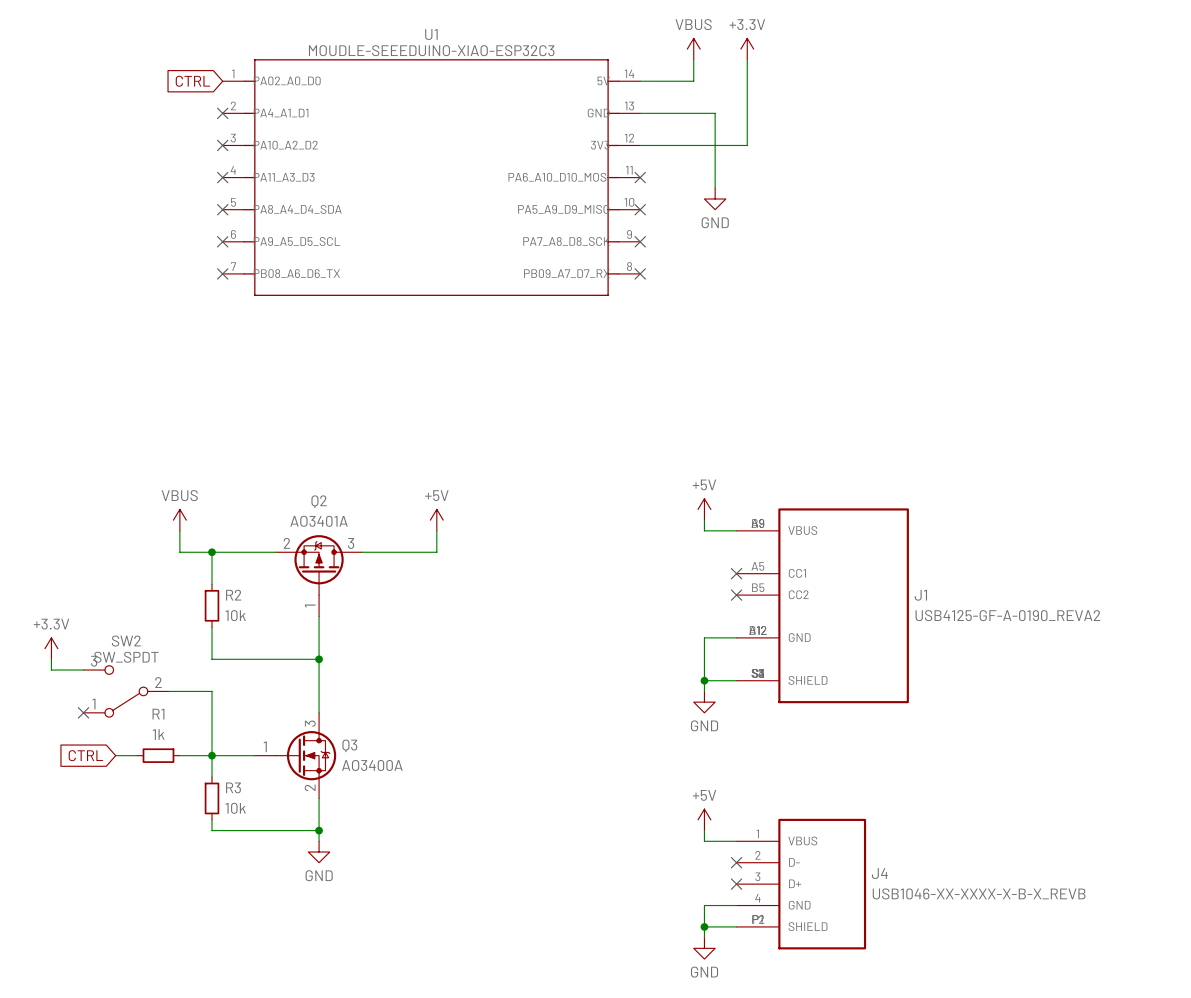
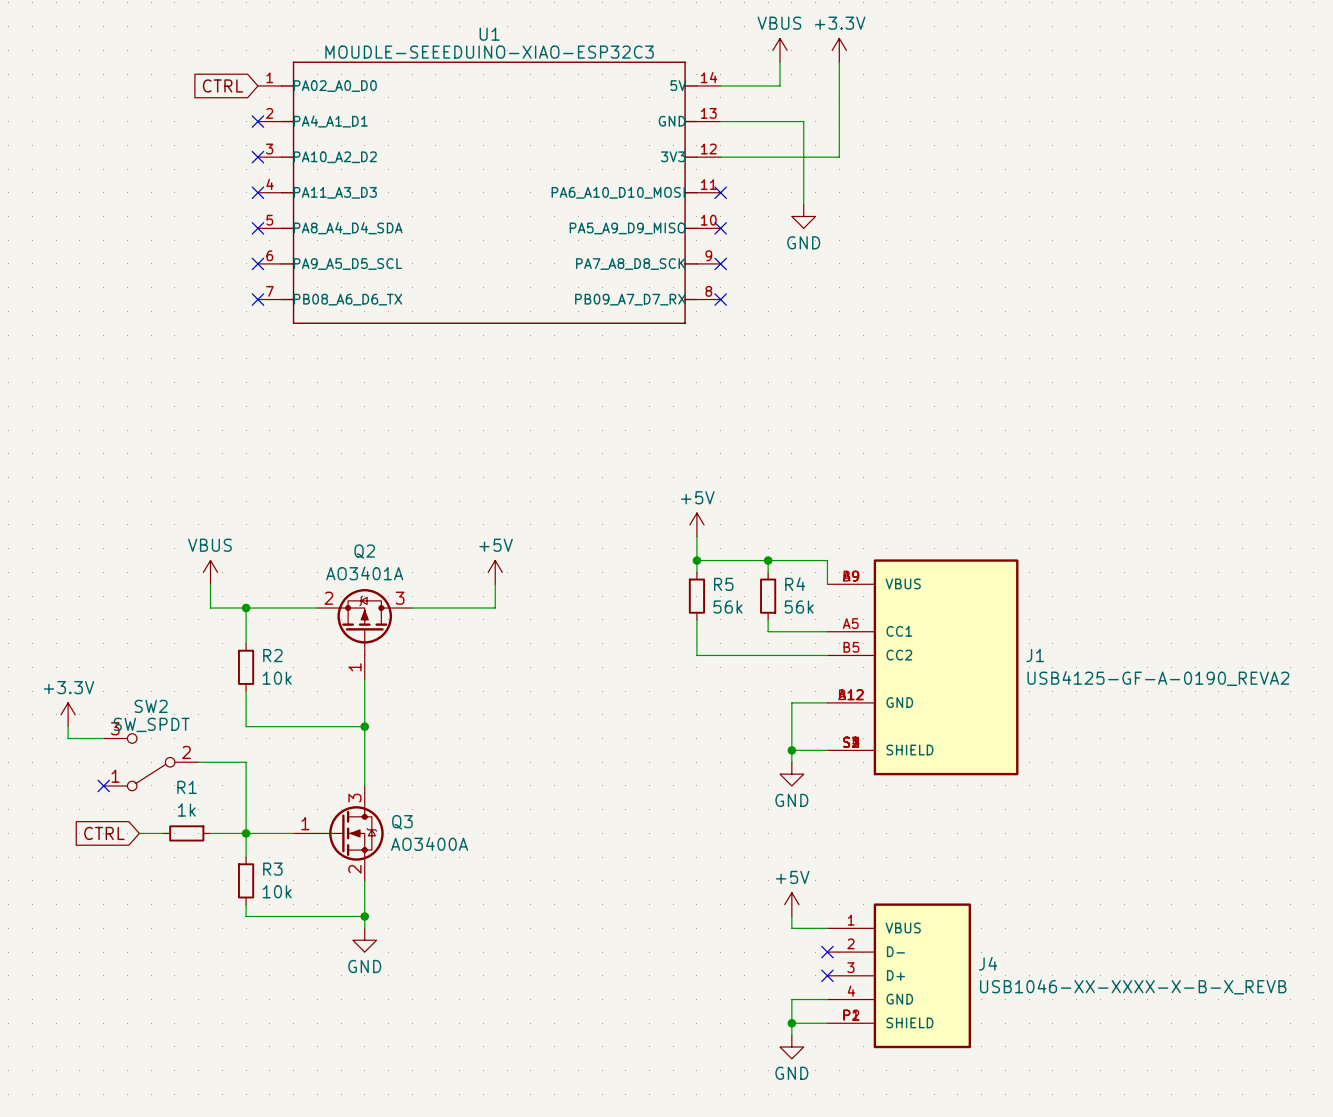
wire: none -> (696, 536) (696, 572)
junction: none -> (696, 560)
wire: none -> (768, 560) (768, 572)
junction: none -> (768, 560)
power symbol position: +5V (704, 509) -> +5V (696, 524)
wire: (704, 520) (704, 530) (736, 530) -> (696, 560) (827, 560) (827, 584)
R5: none -> 56k (696, 596)
R4: none -> 56k (768, 596)
wire: none -> (696, 619) (696, 655) (827, 655)
wire: none -> (768, 619) (768, 631) (827, 631)
no-connect mark: (736, 573) -> none
no-connect mark: (736, 595) -> none

